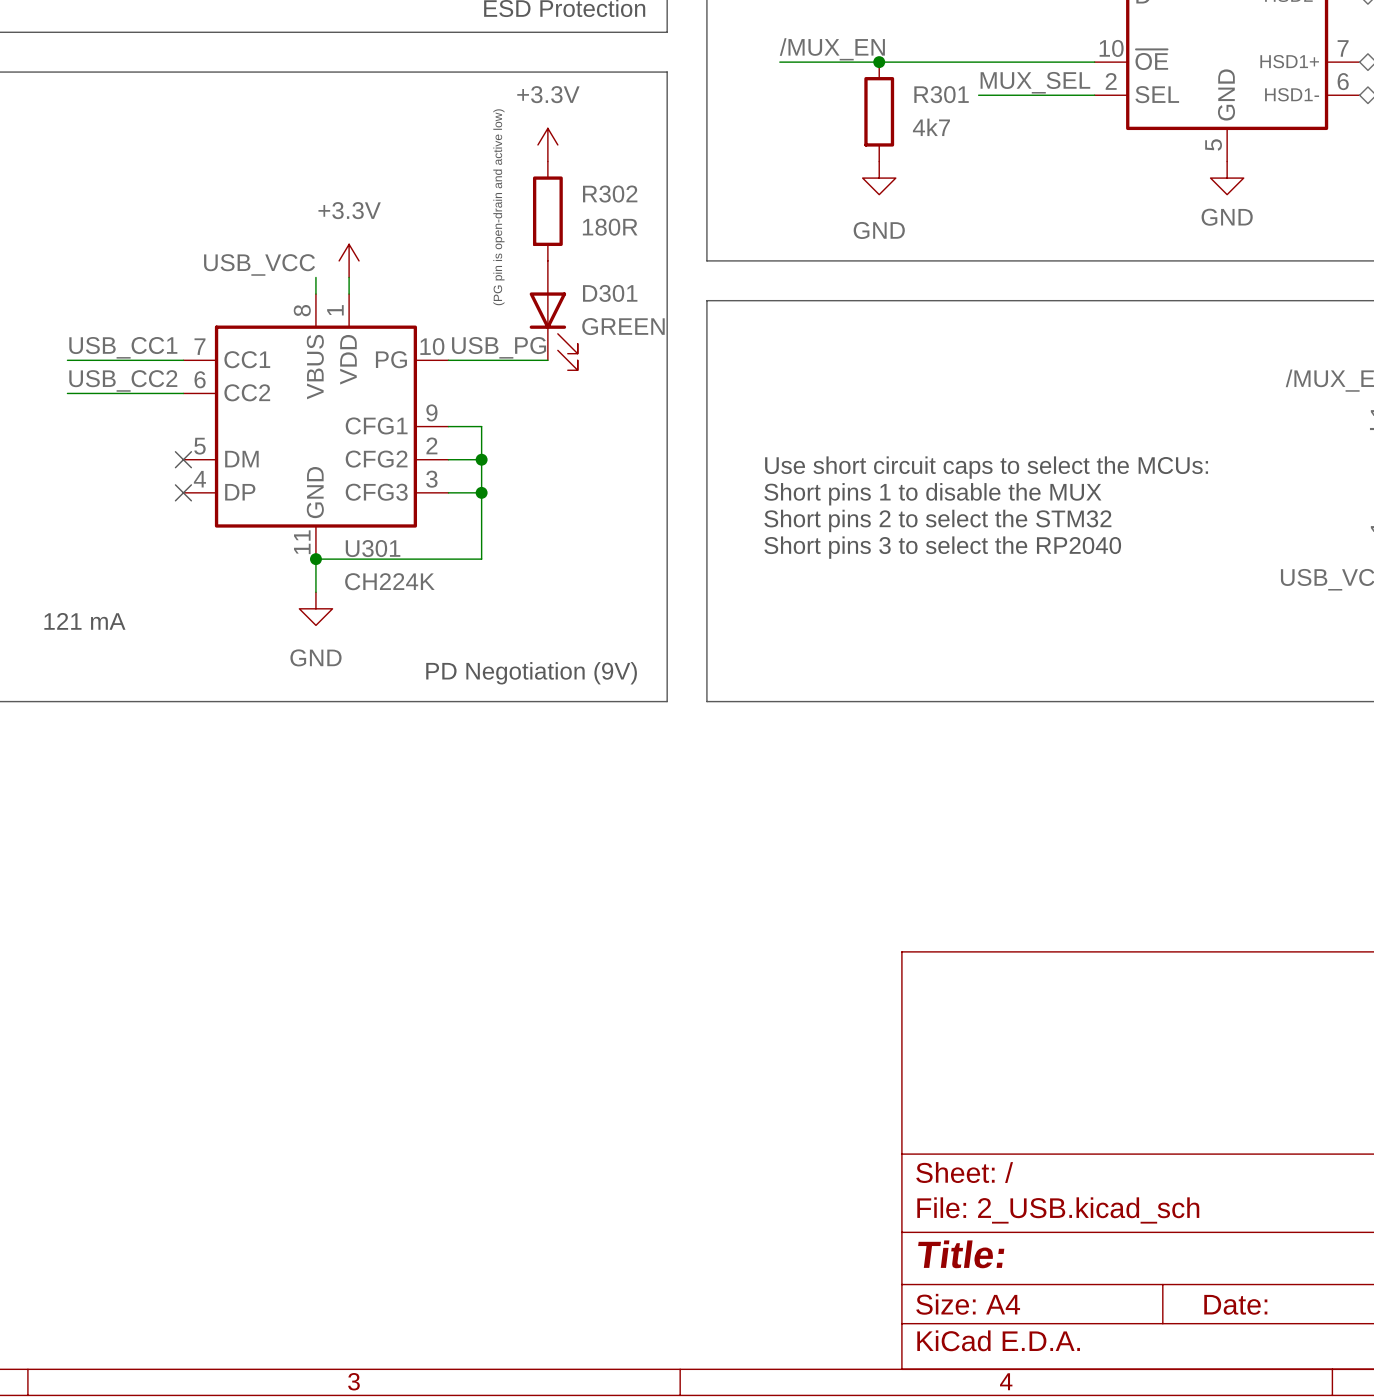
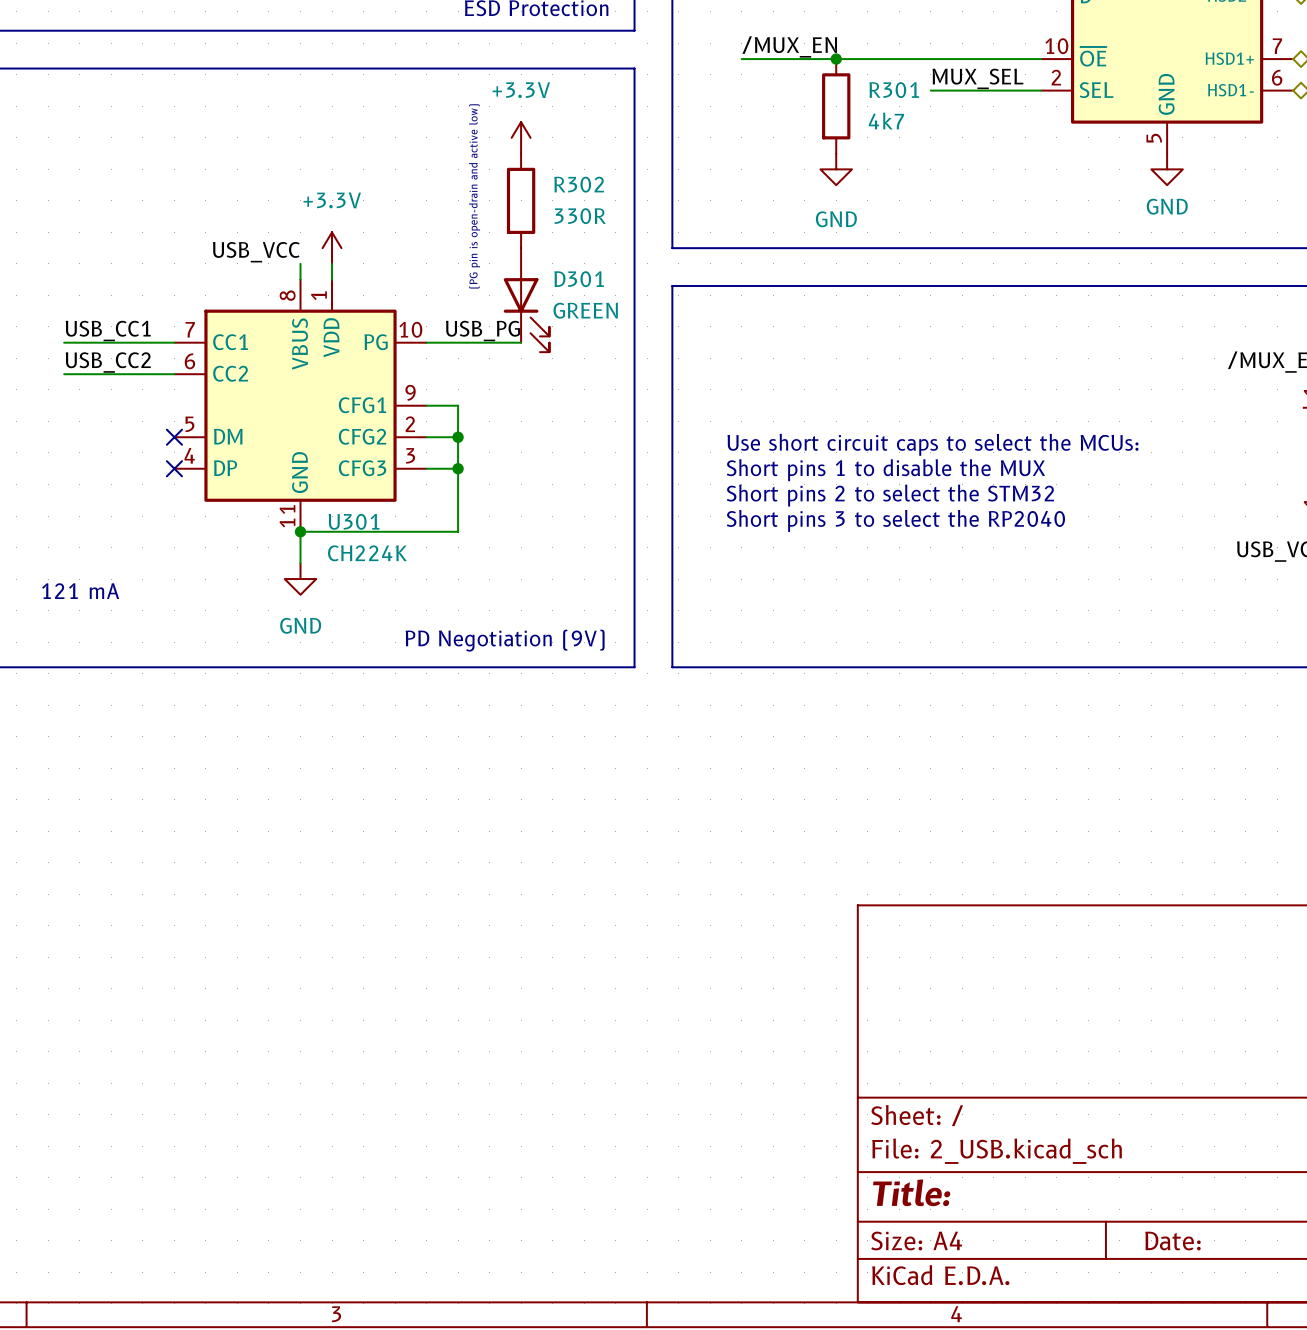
R302 value: 180R (610, 227) -> 330R (580, 216)

